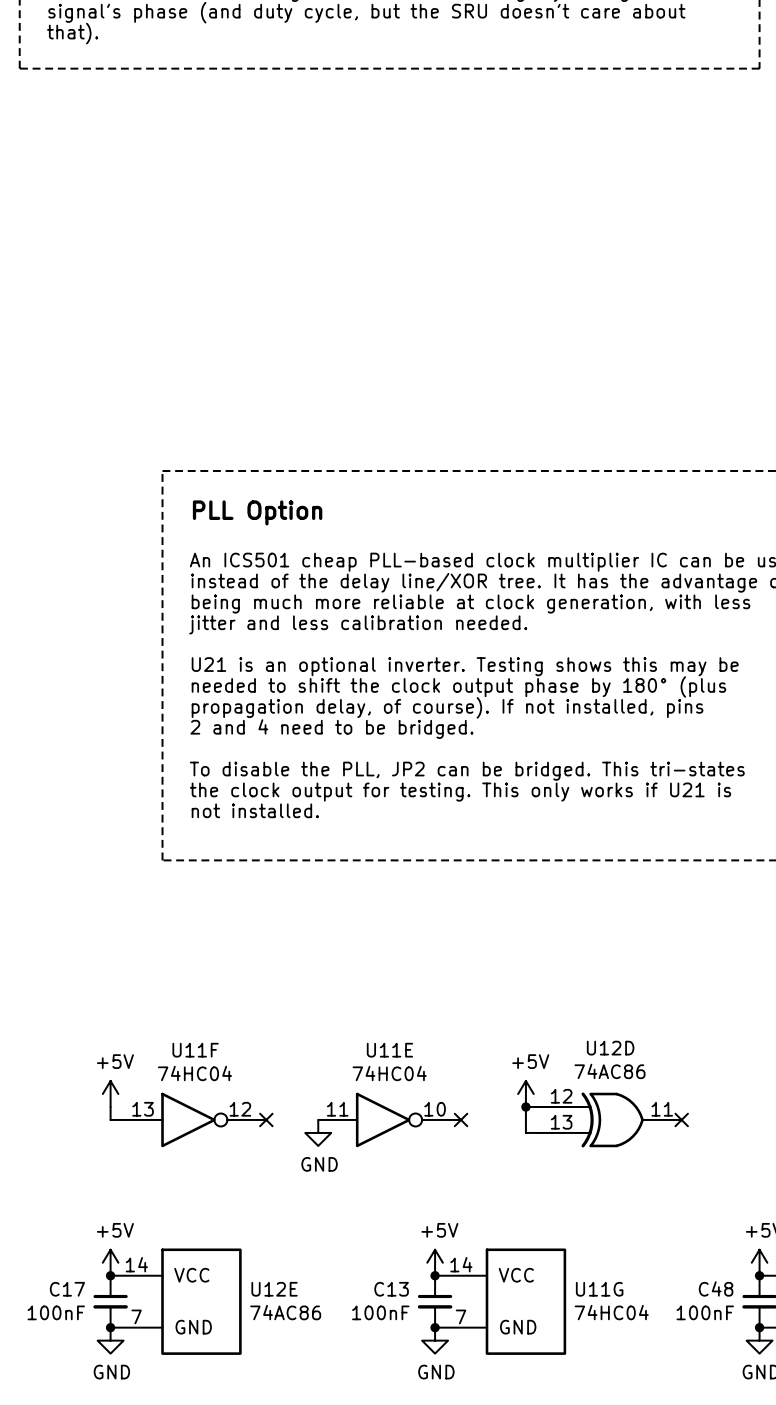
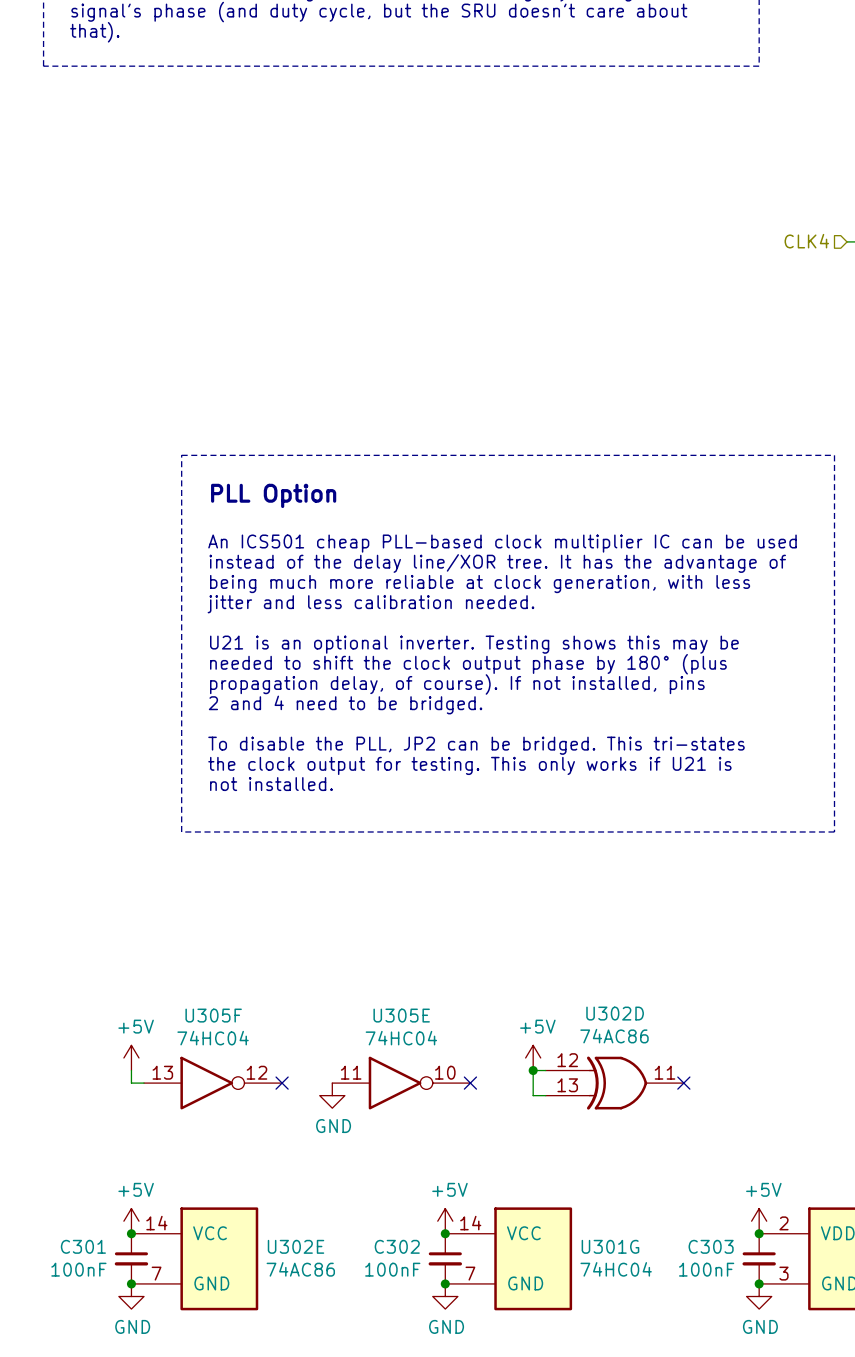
U12D name: U12D (610, 1048) -> U302D (615, 1013)
U11F name: U11F (195, 1050) -> U305F (213, 1015)
U11E name: U11E (389, 1050) -> U305E (401, 1015)
C48 name: C48 (716, 1288) -> C303 (711, 1246)
C17 name: C17 (67, 1289) -> C301 (83, 1246)
U12E name: U12E (274, 1289) -> U302E (296, 1246)
C13 name: C13 (391, 1289) -> C302 (397, 1246)
U11G name: U11G (599, 1289) -> U301G (610, 1246)

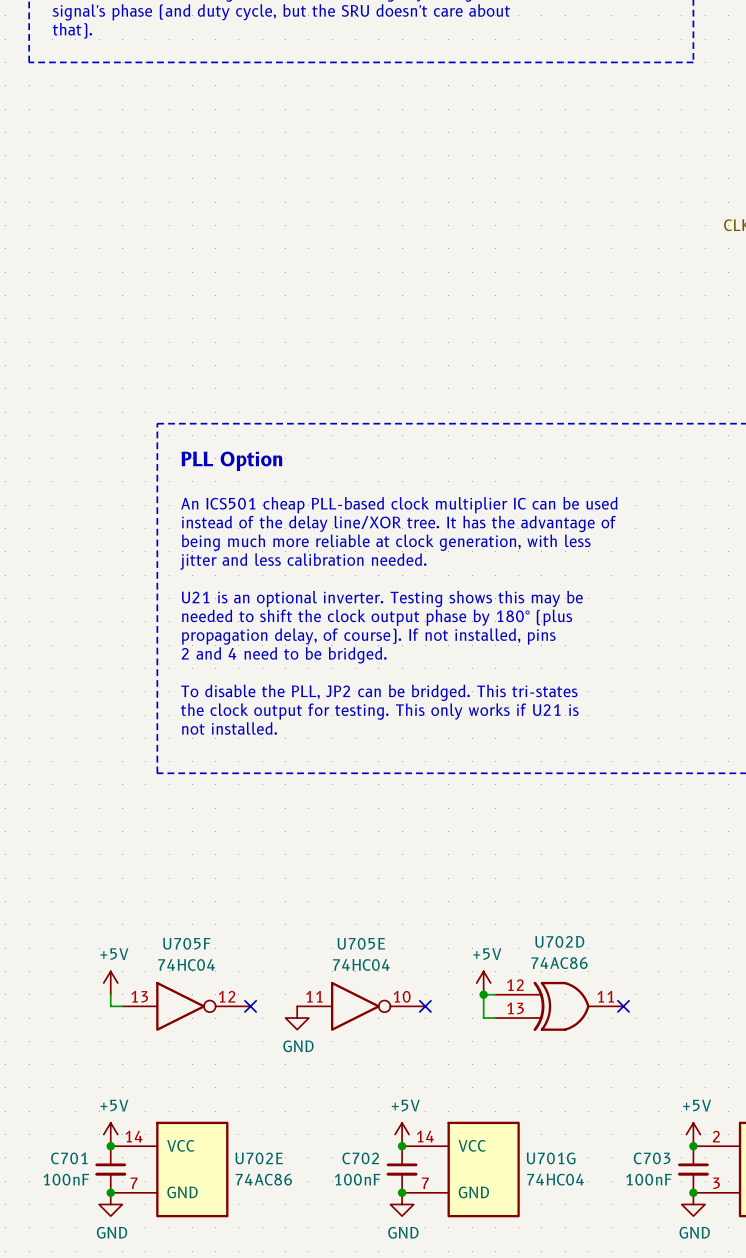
U302D name: U302D (615, 1013) -> U702D (559, 941)
U305F name: U305F (213, 1015) -> U705F (186, 943)
U305E name: U305E (401, 1015) -> U705E (361, 943)
C301 name: C301 (83, 1246) -> C701 (69, 1158)
U302E name: U302E (296, 1246) -> U702E (259, 1158)
C302 name: C302 (397, 1246) -> C702 (360, 1158)
U301G name: U301G (610, 1246) -> U701G (551, 1158)
C303 name: C303 (711, 1246) -> C703 (652, 1158)

